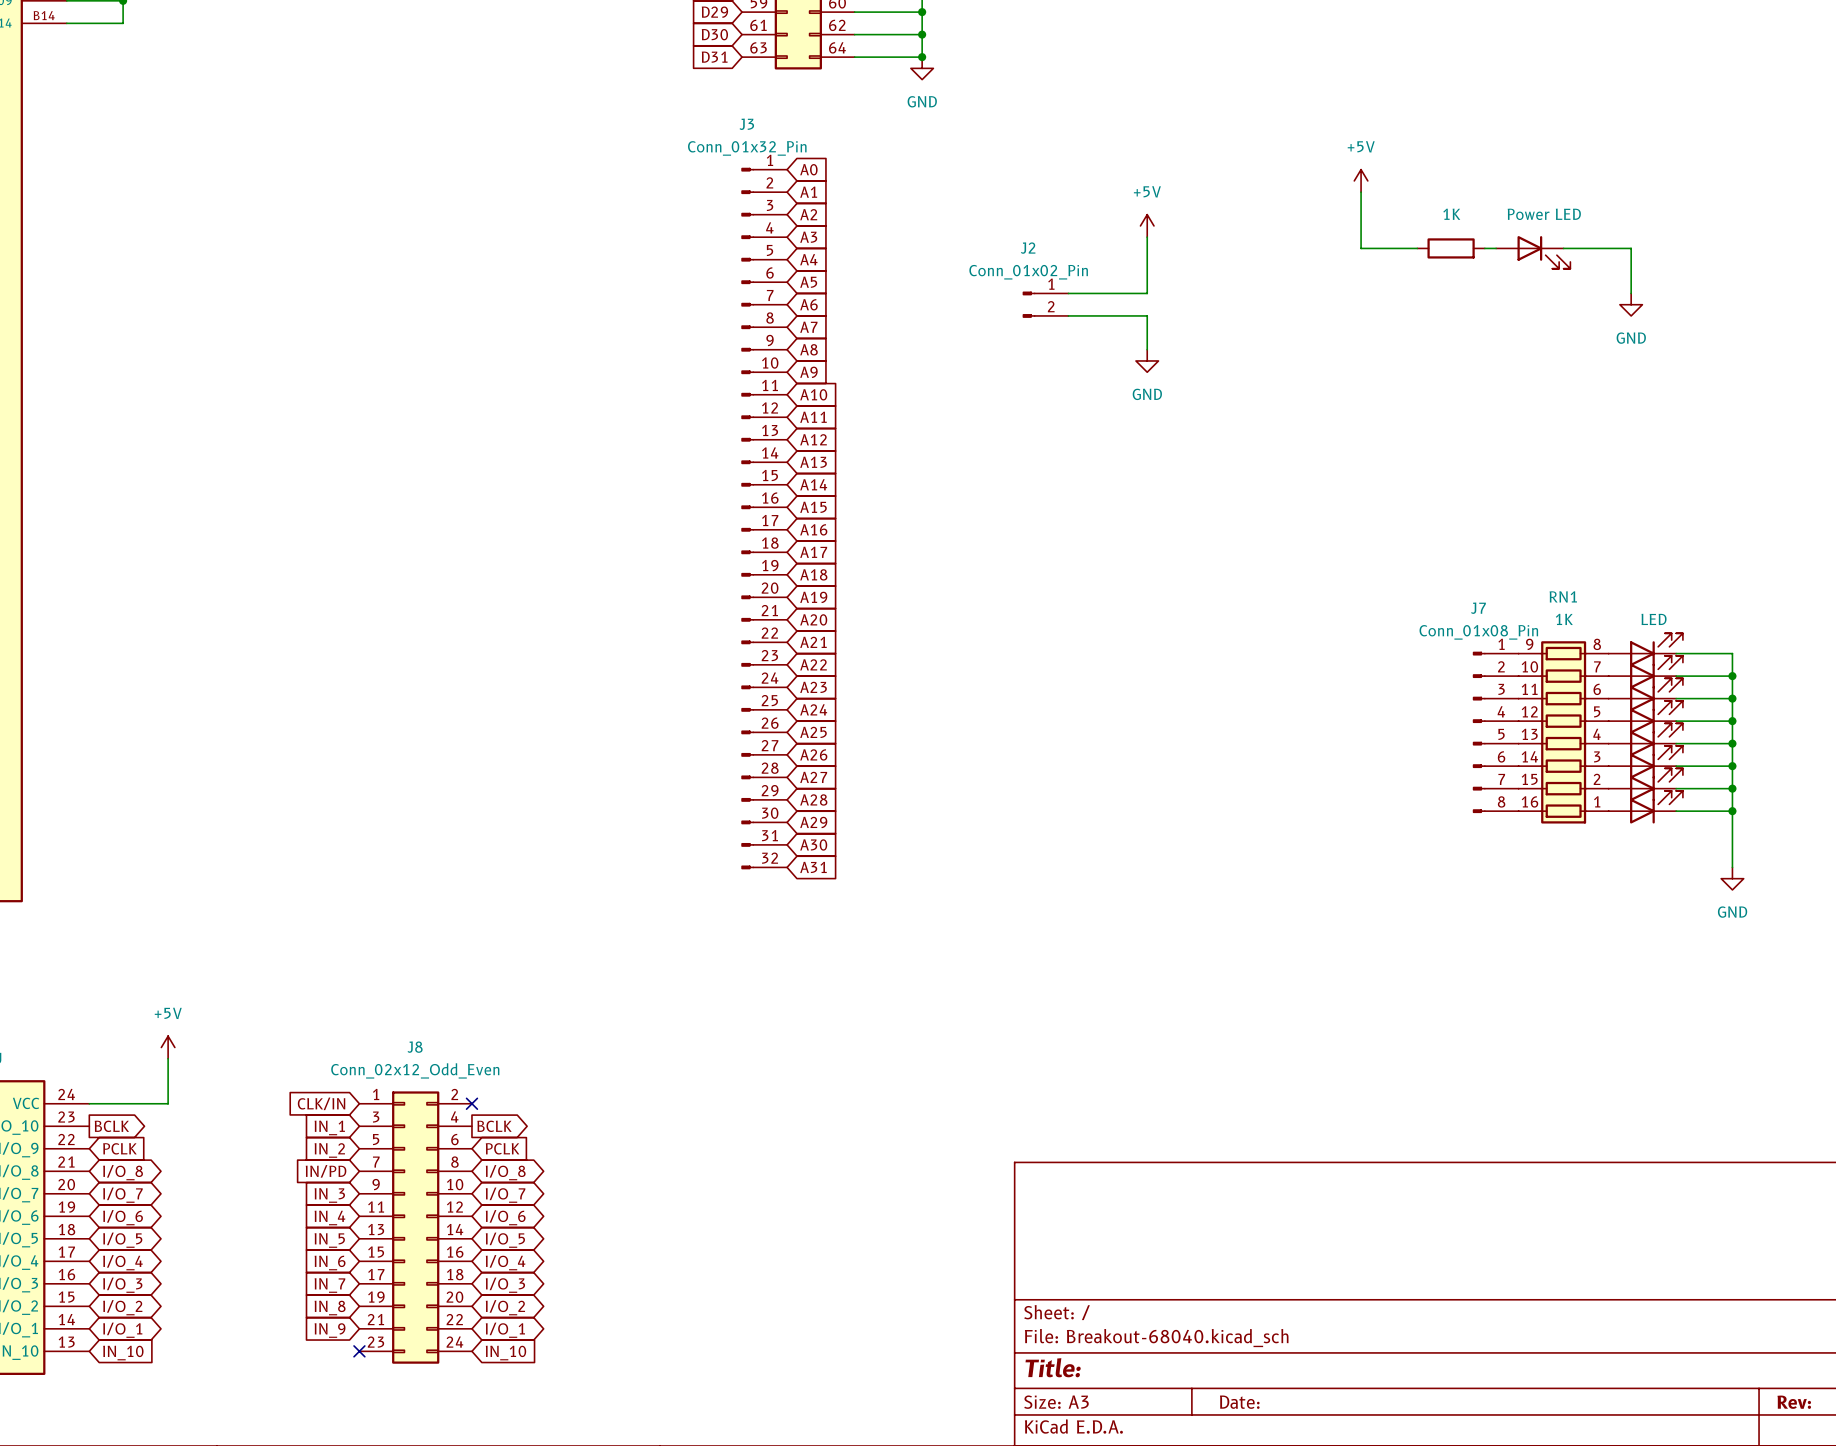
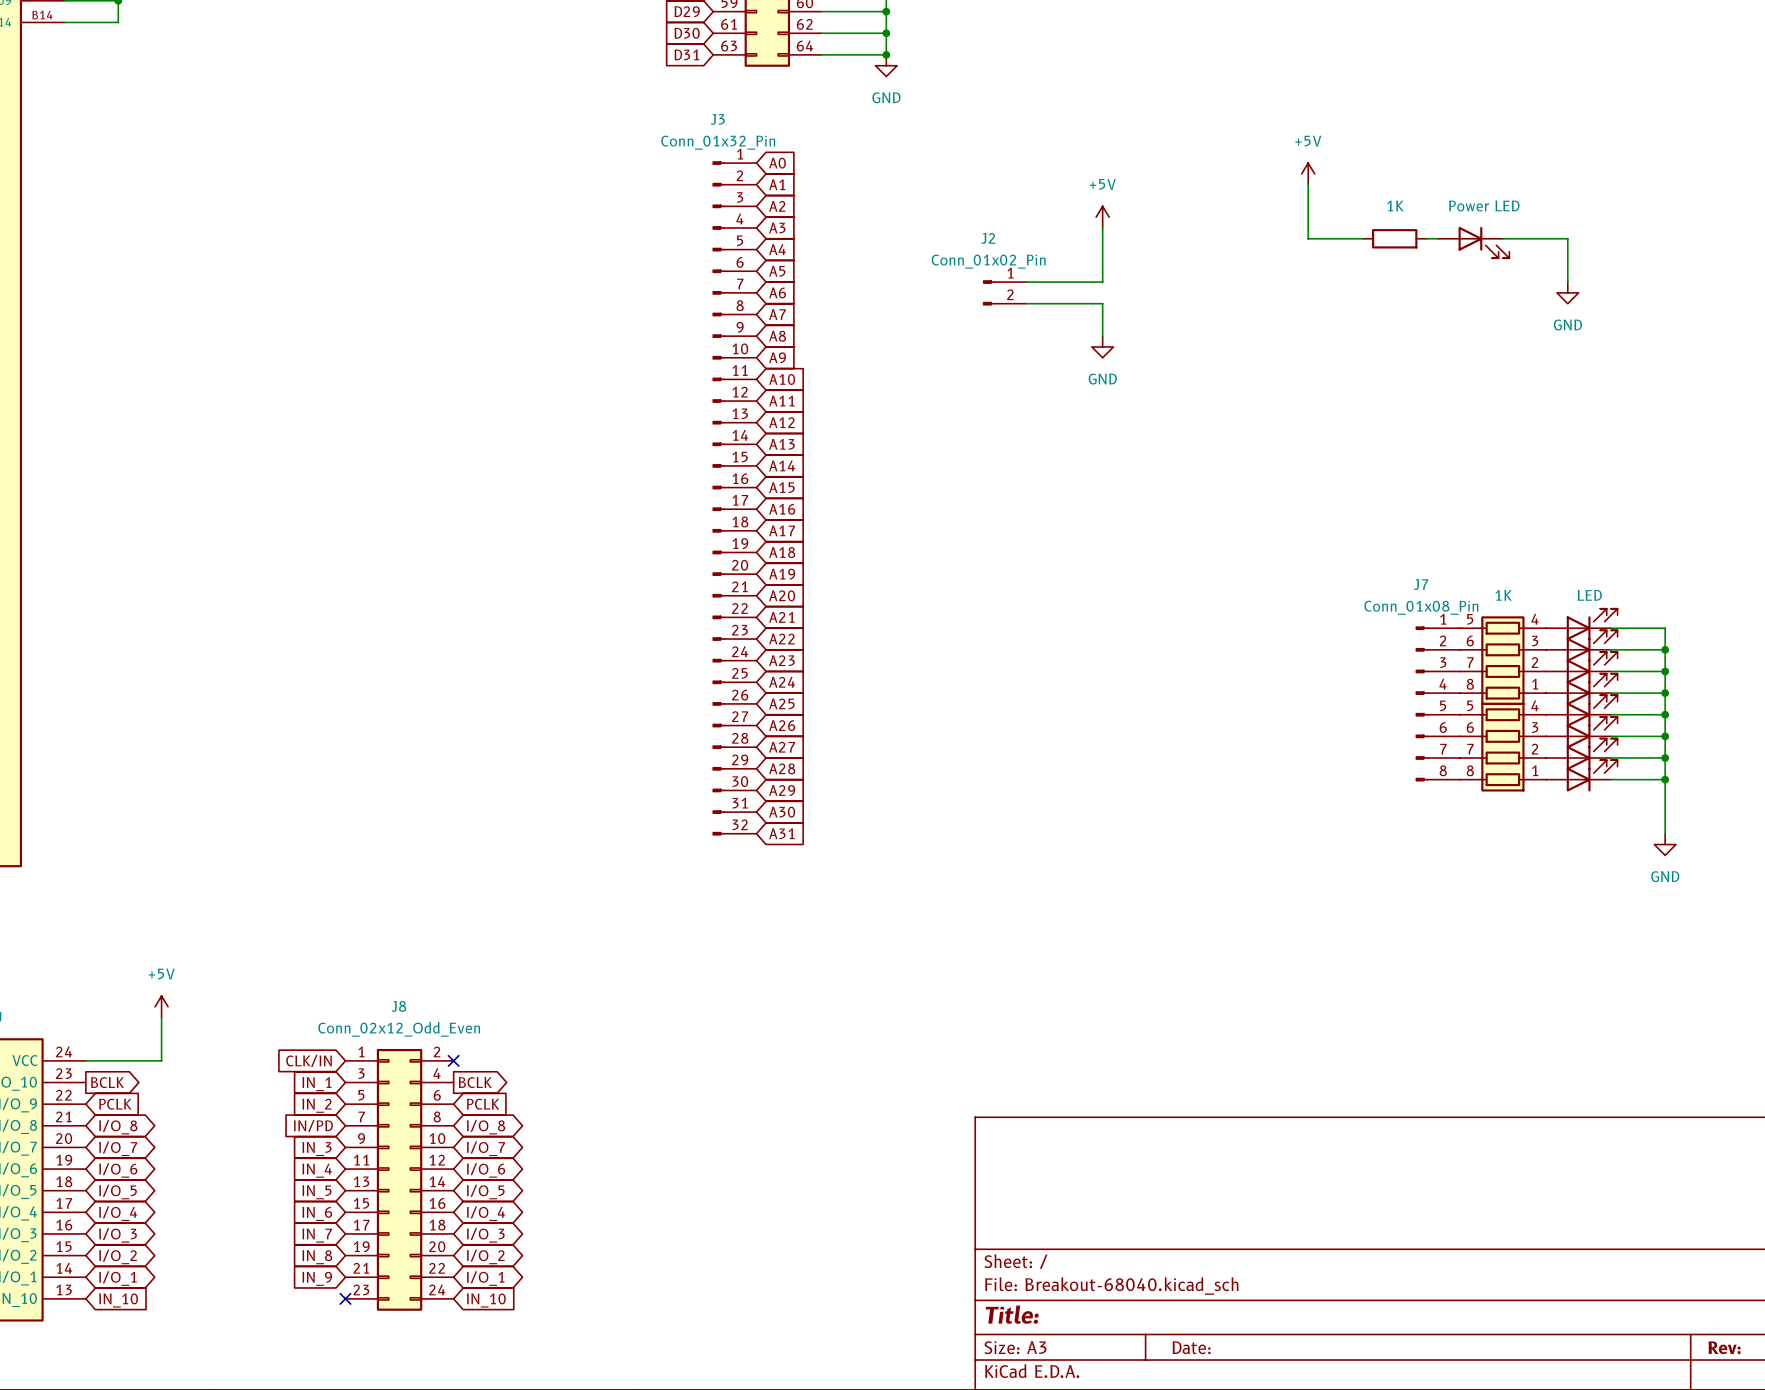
part: none -> 1K (1502, 660)
RN1: 1K (1563, 732) -> none
part: none -> (1502, 747)

